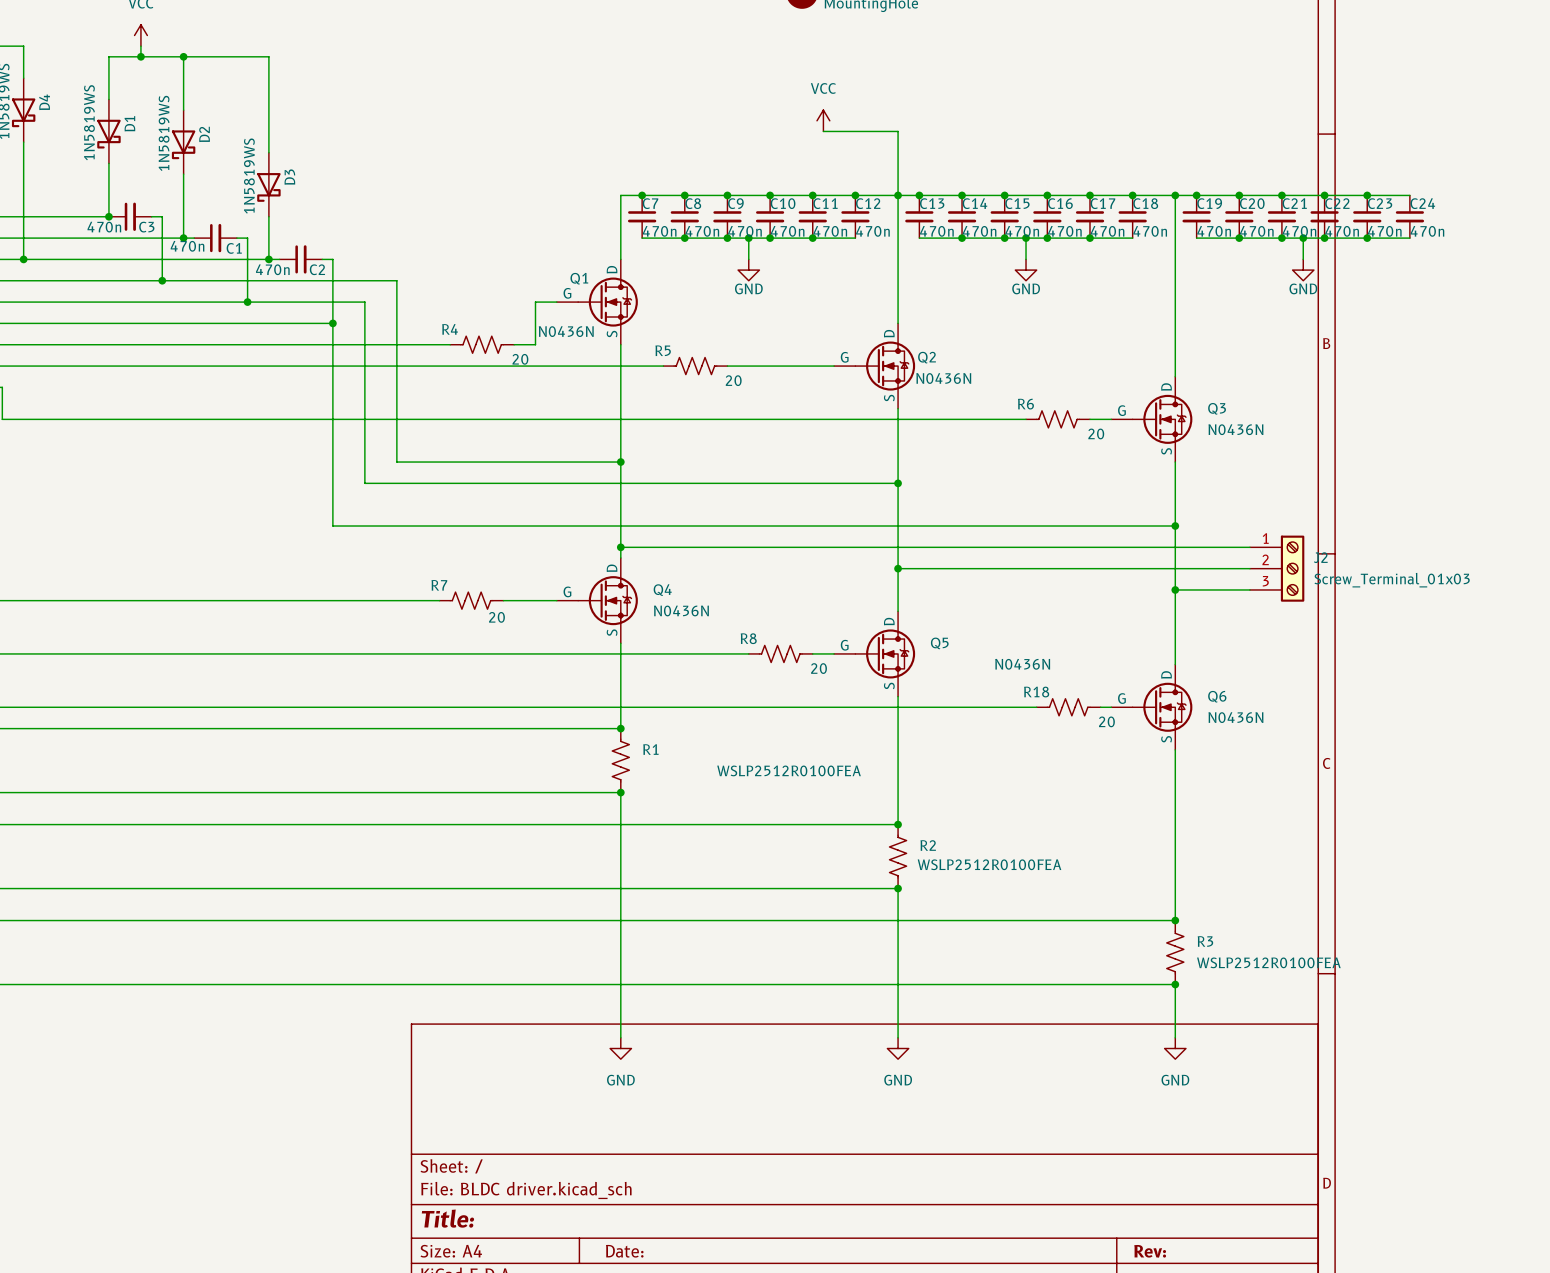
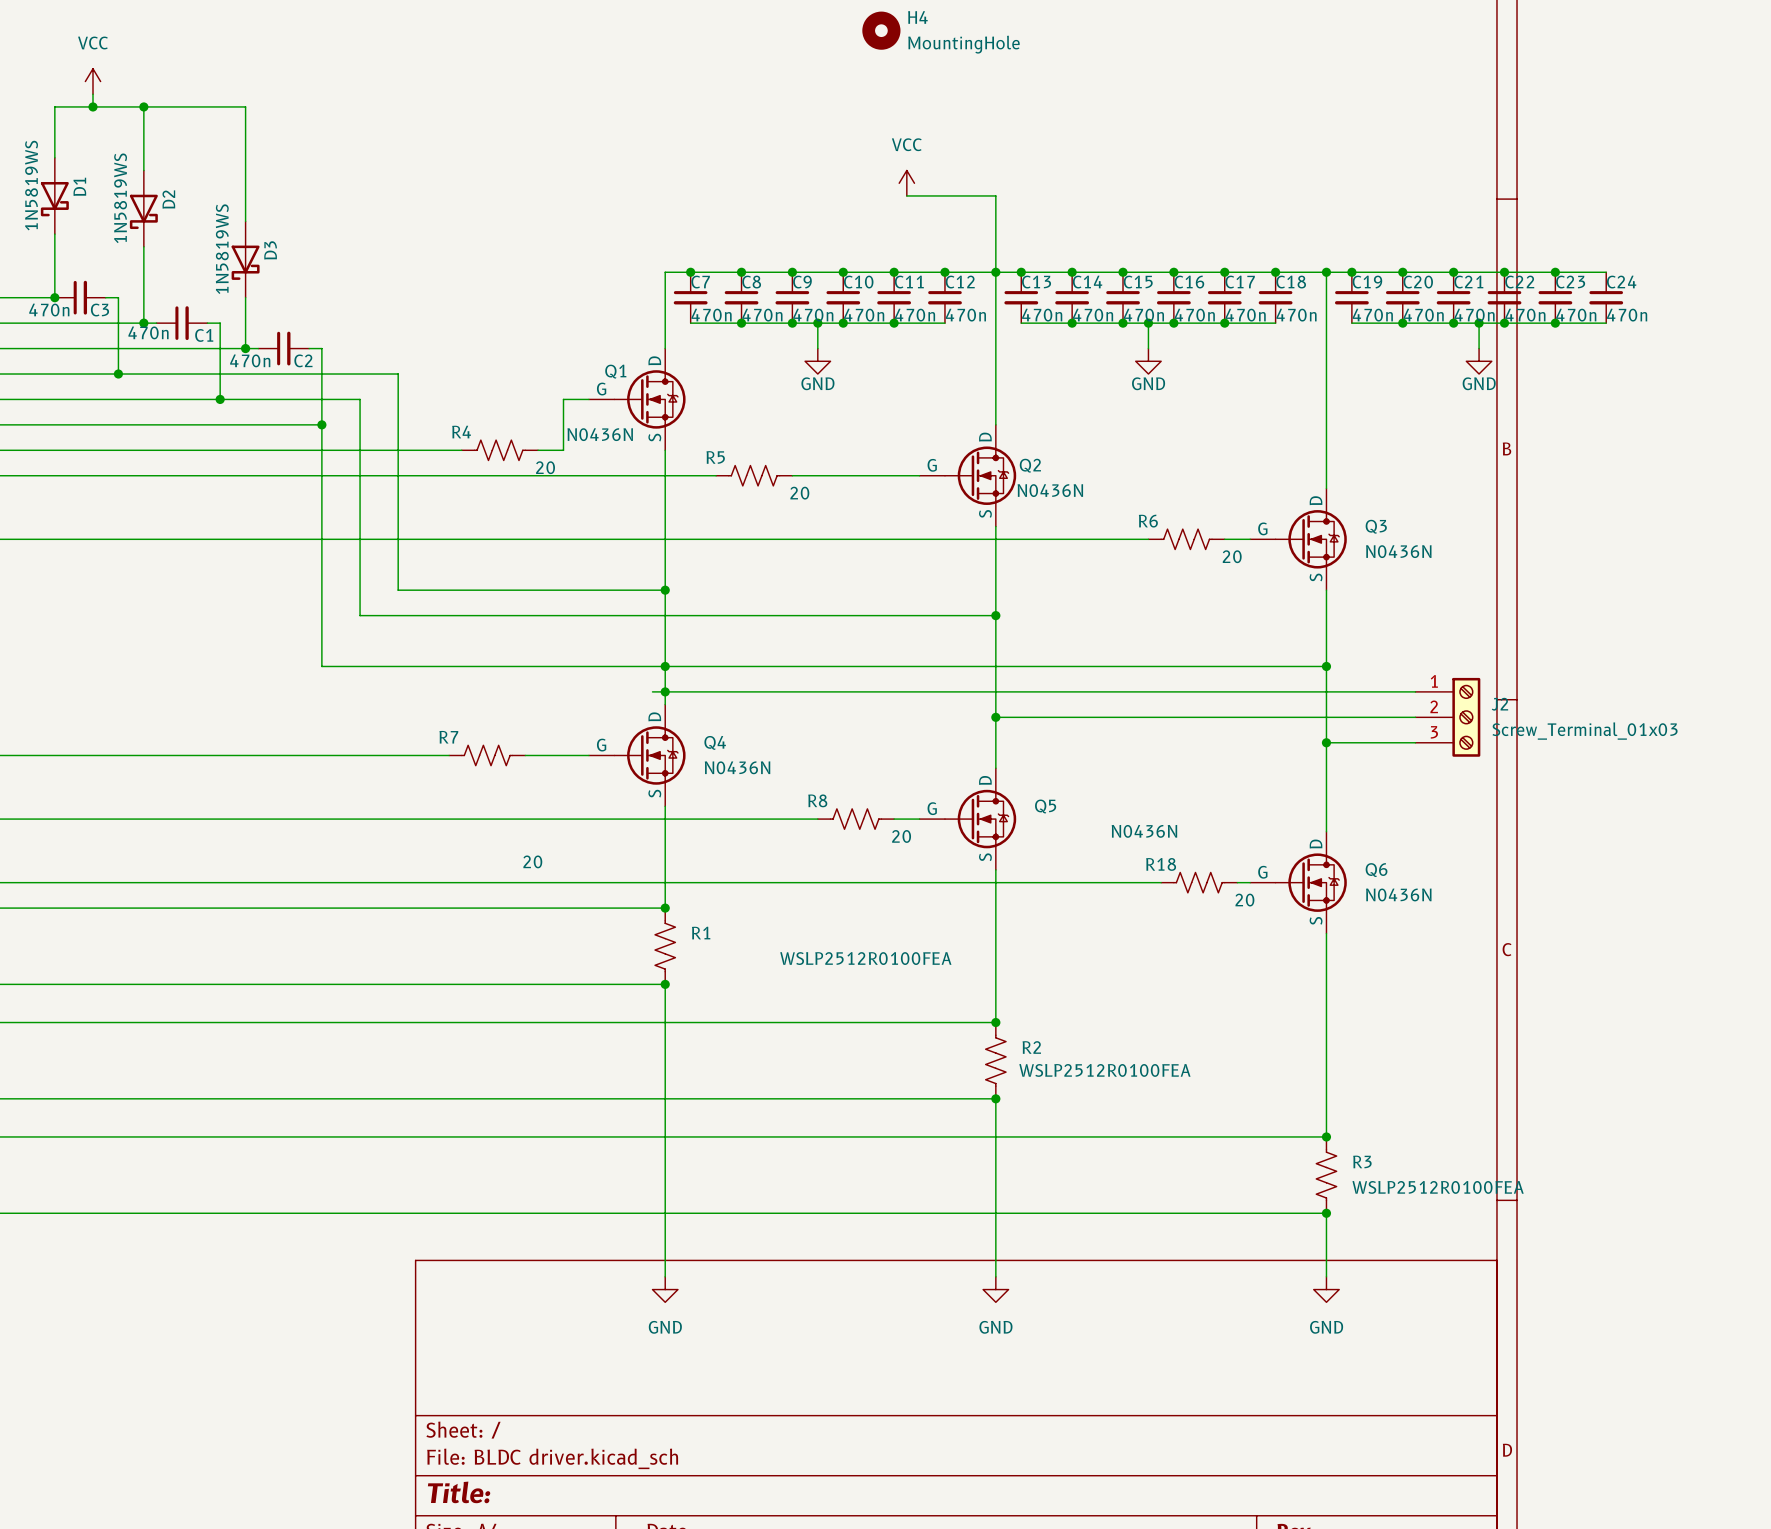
junction: none -> (665, 666)
wire: none -> (652, 691) (665, 691)
R7 value position: 20 (496, 617) -> 20 (532, 861)

